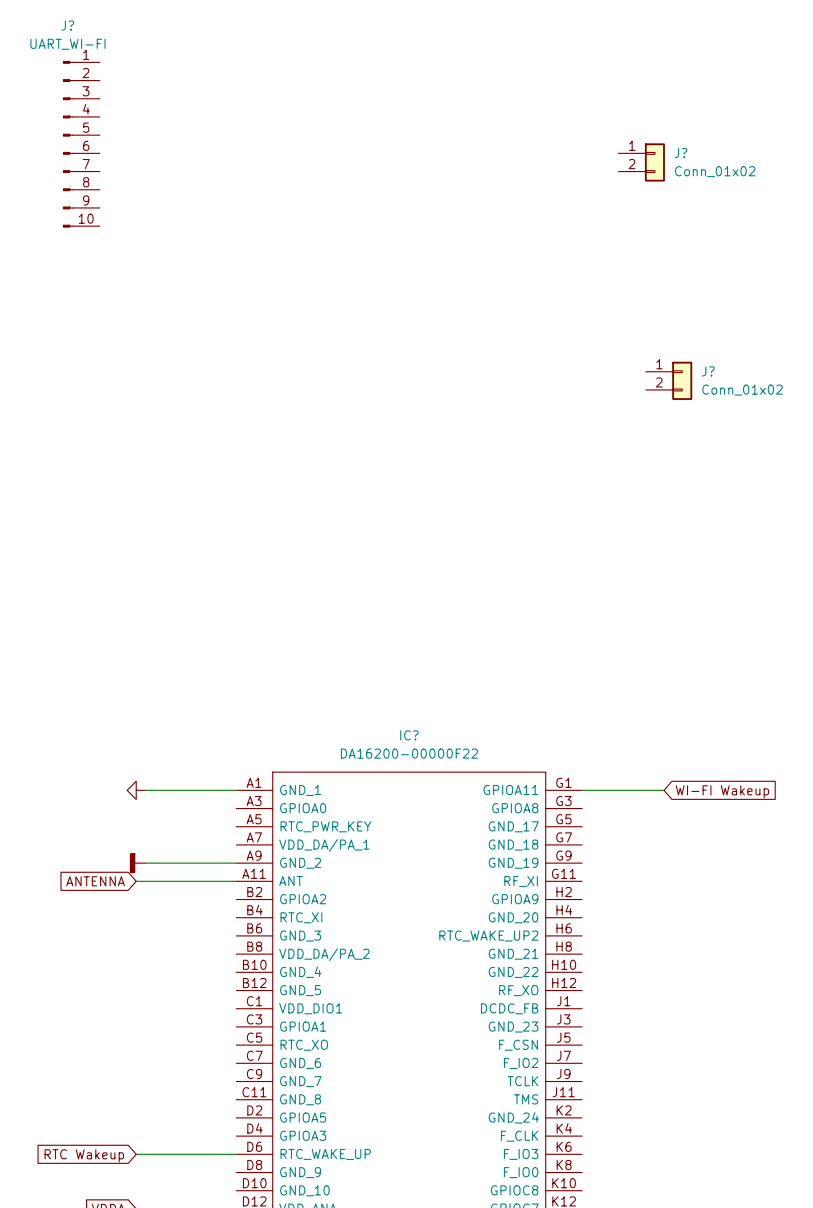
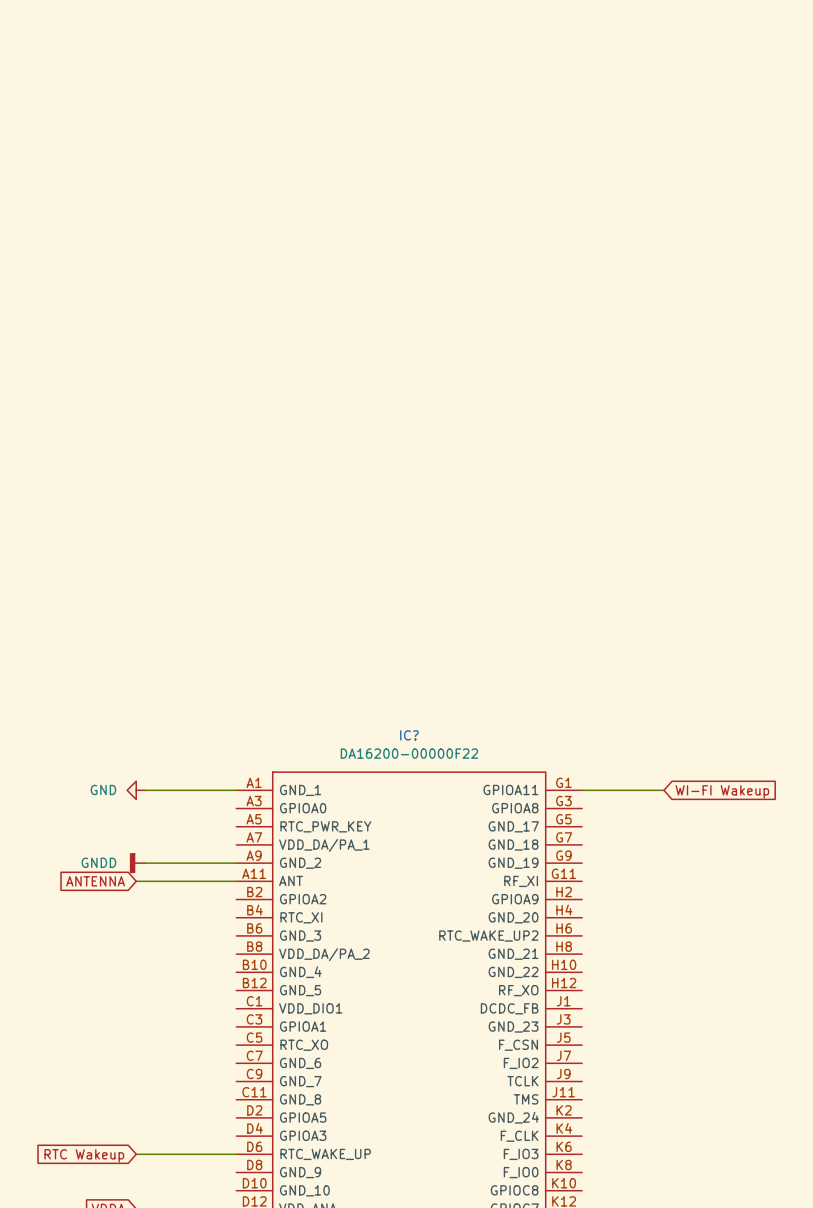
J?: UART_WI-FI (81, 144) -> none
J?: Conn_01x02 (641, 162) -> none
J?: Conn_01x02 (669, 380) -> none
power symbol text: none -> GND (103, 789)
power symbol text: none -> GNDD (98, 862)

